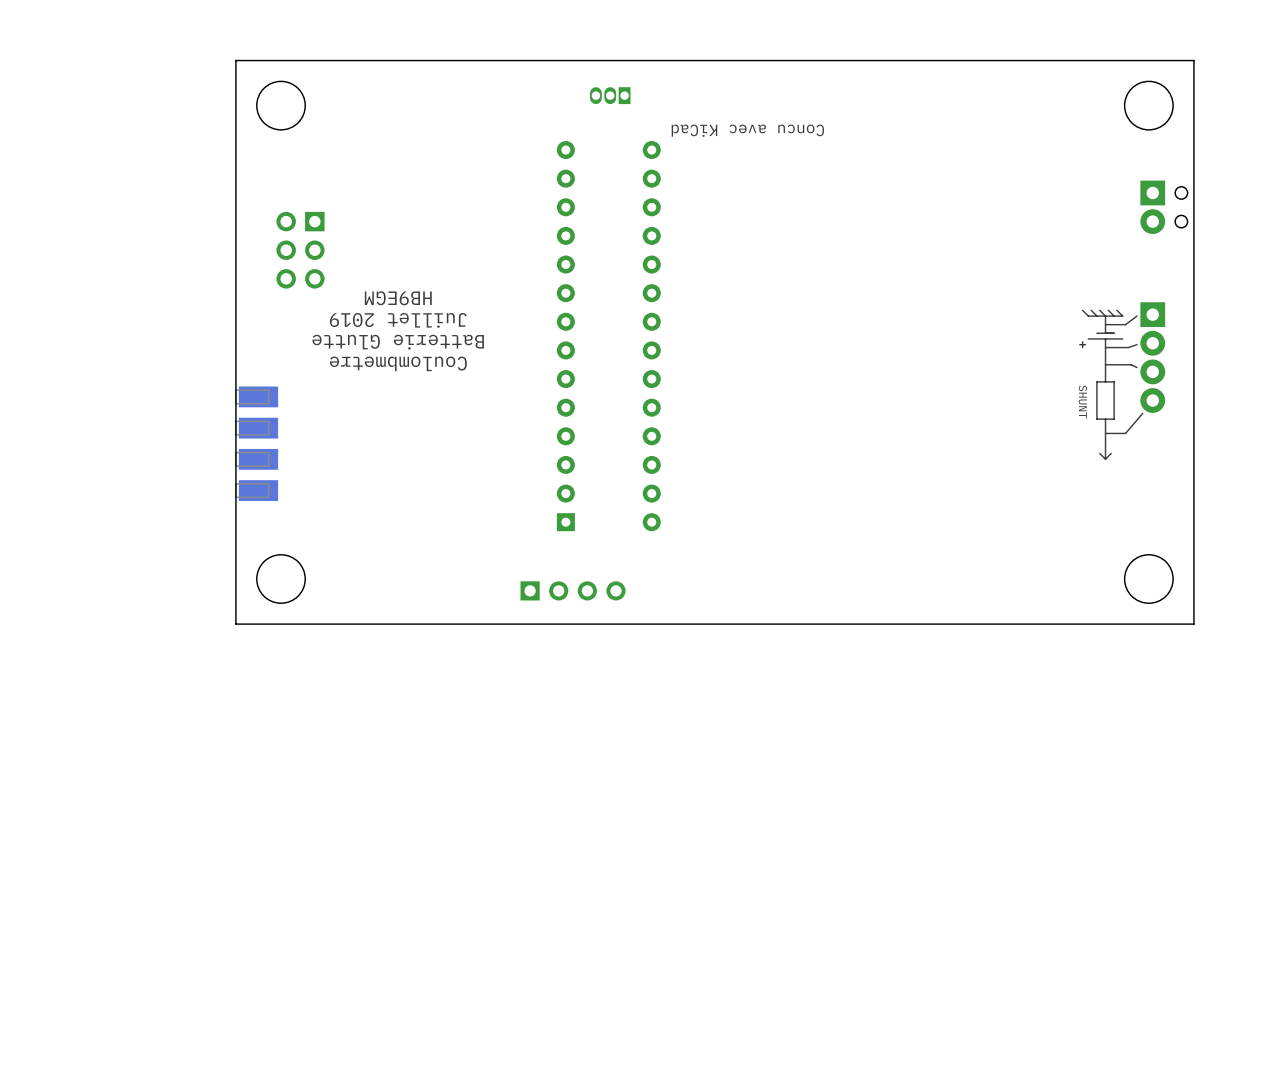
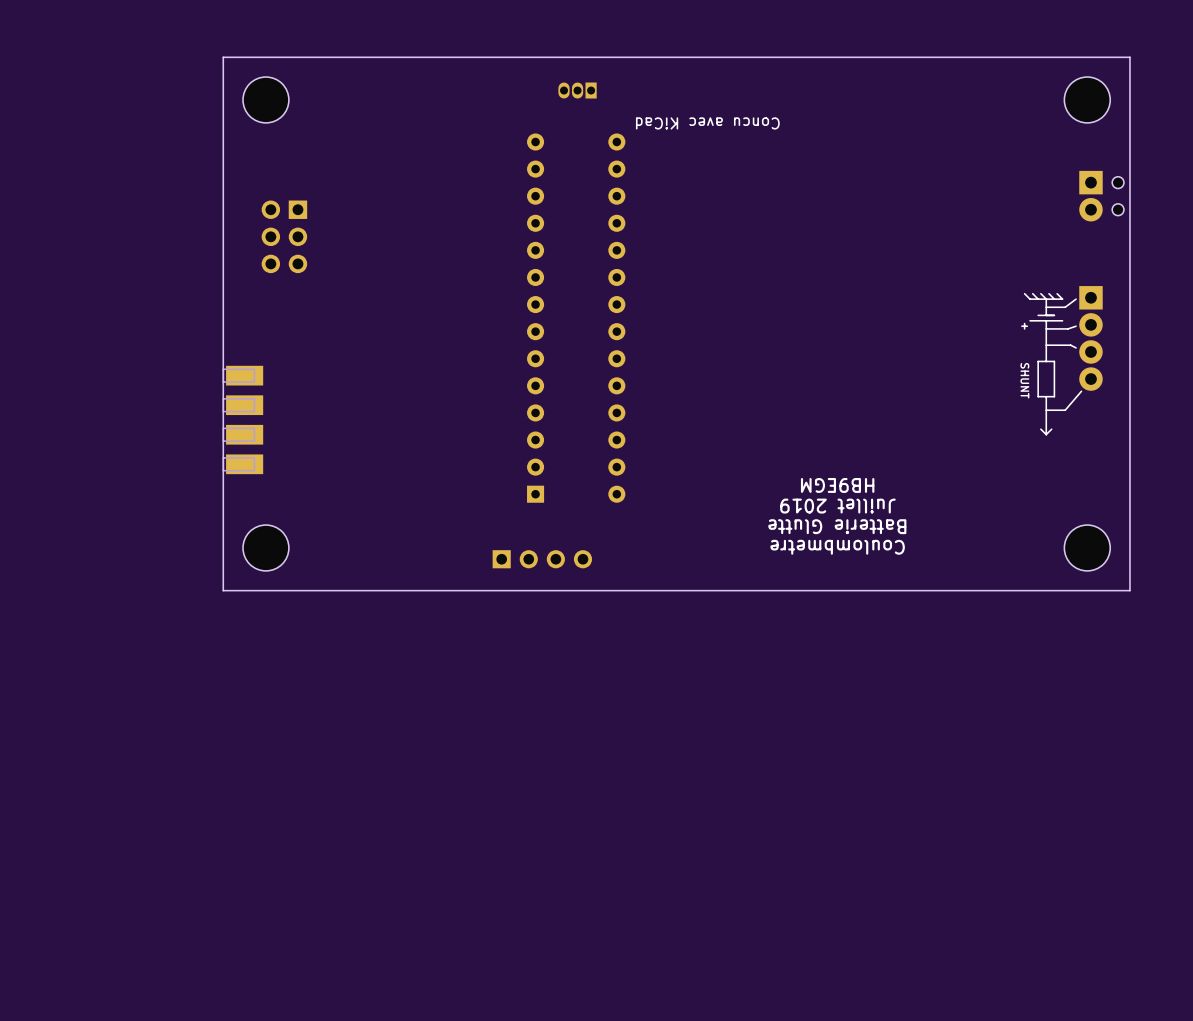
text: HB9EGM (398, 298) -> none
text: Juillet 2019 (398, 320) -> none
text: Batterie Glutte (398, 342) -> none
text: Coulombmetre (398, 363) -> none
text: none -> HB9EGM (837, 485)
text: none -> Juillet 2019 (837, 506)
text: none -> Batterie Glutte (837, 526)
text: none -> Coulombmetre (837, 547)

